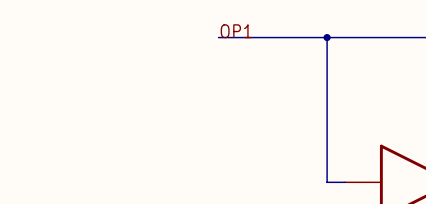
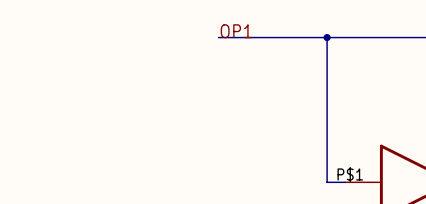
part pin number: none -> P$1 (350, 174)

